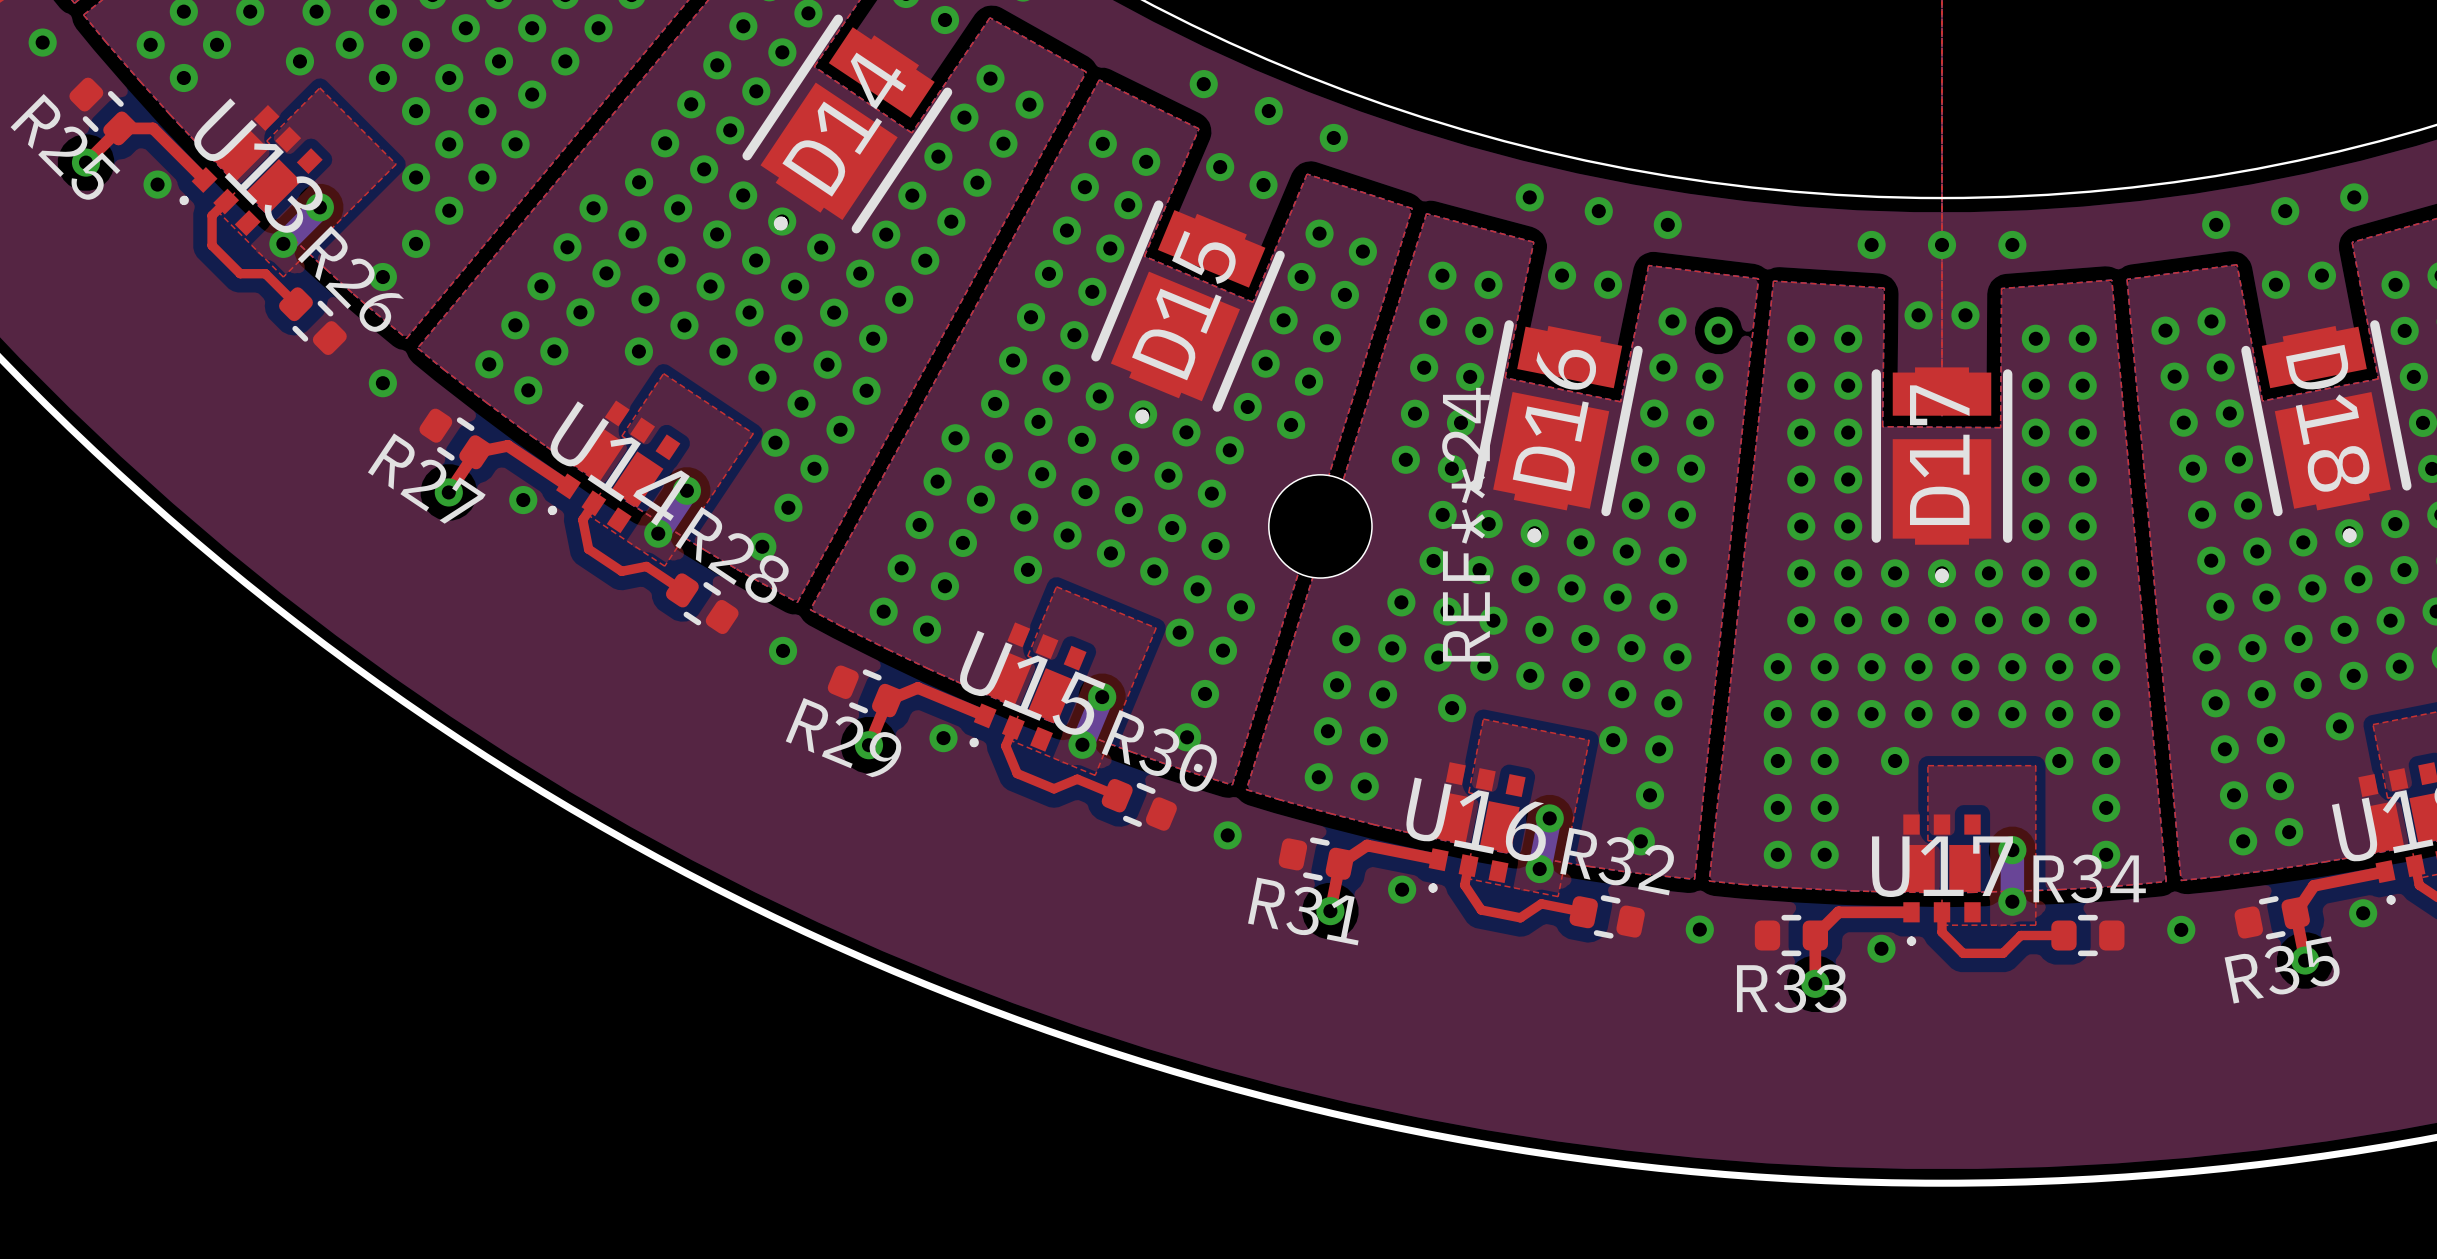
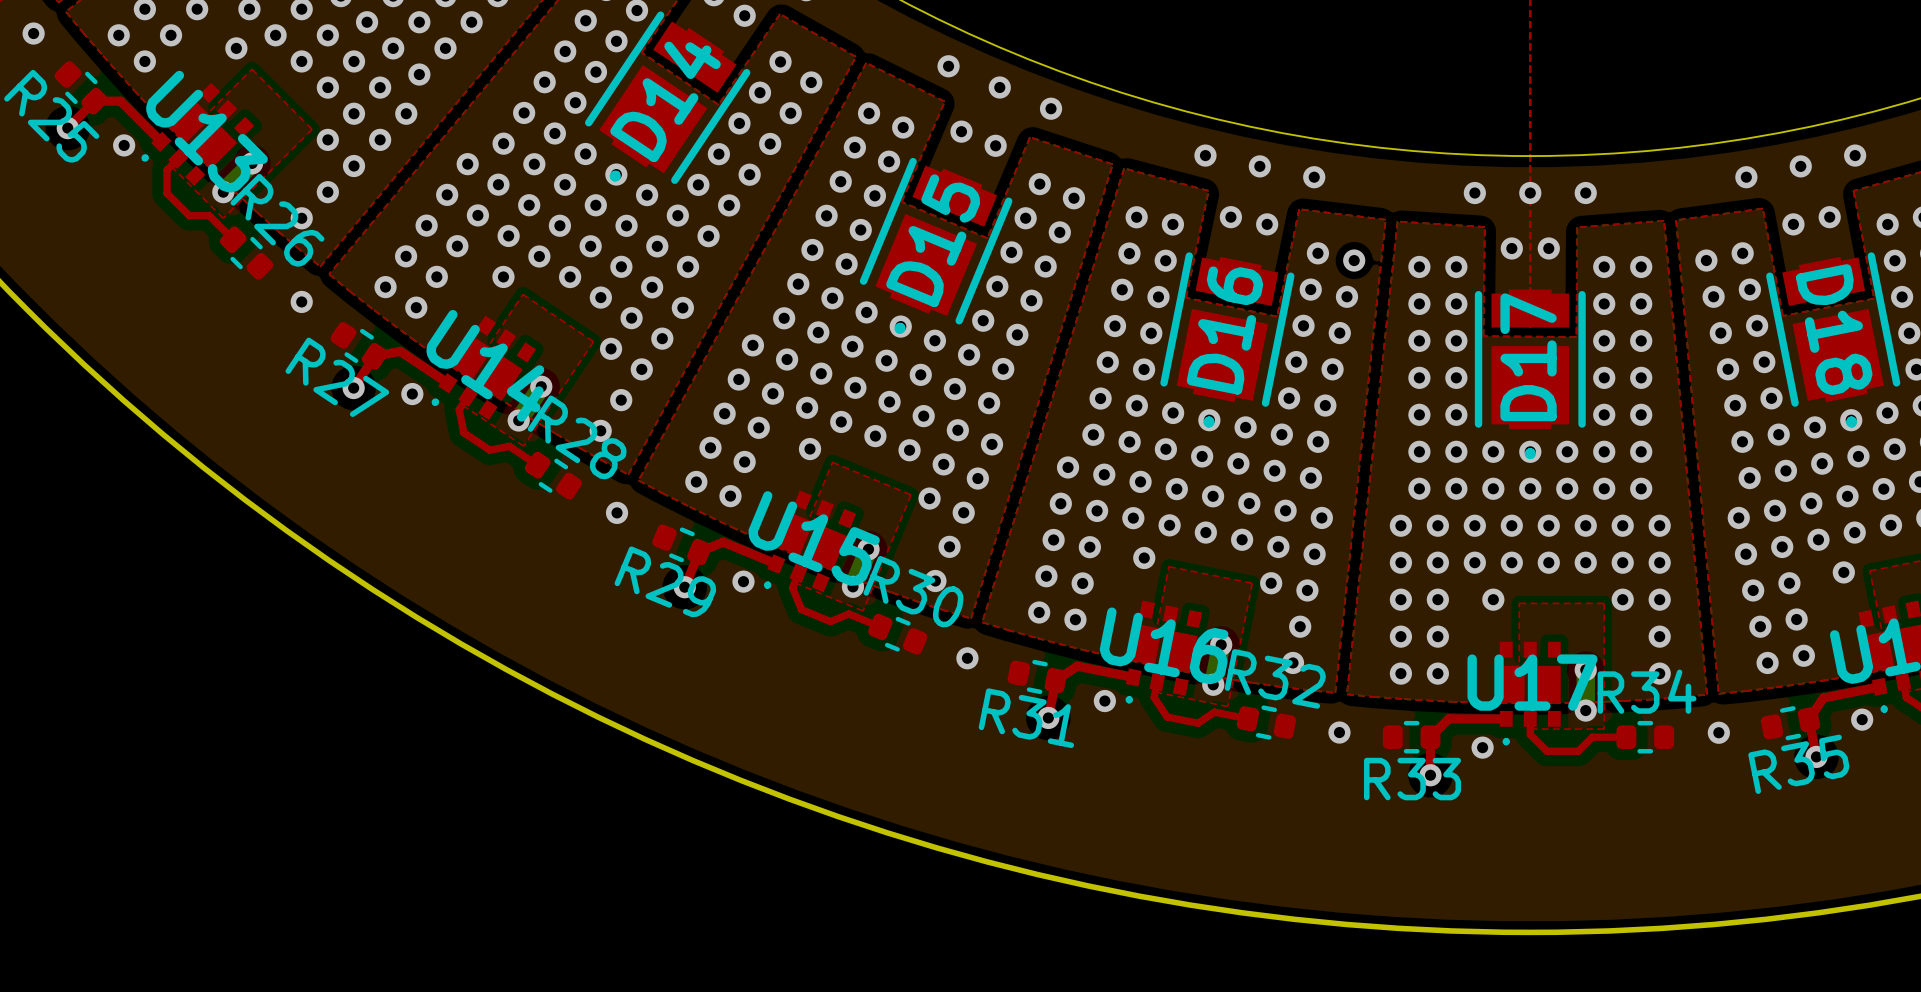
via: none -> (1003, 369)
via: none -> (1100, 398)
via: none -> (989, 403)
REF**24: (1320, 526) -> none
via: none -> (1093, 434)
via: none -> (992, 444)
via: none -> (1068, 467)

